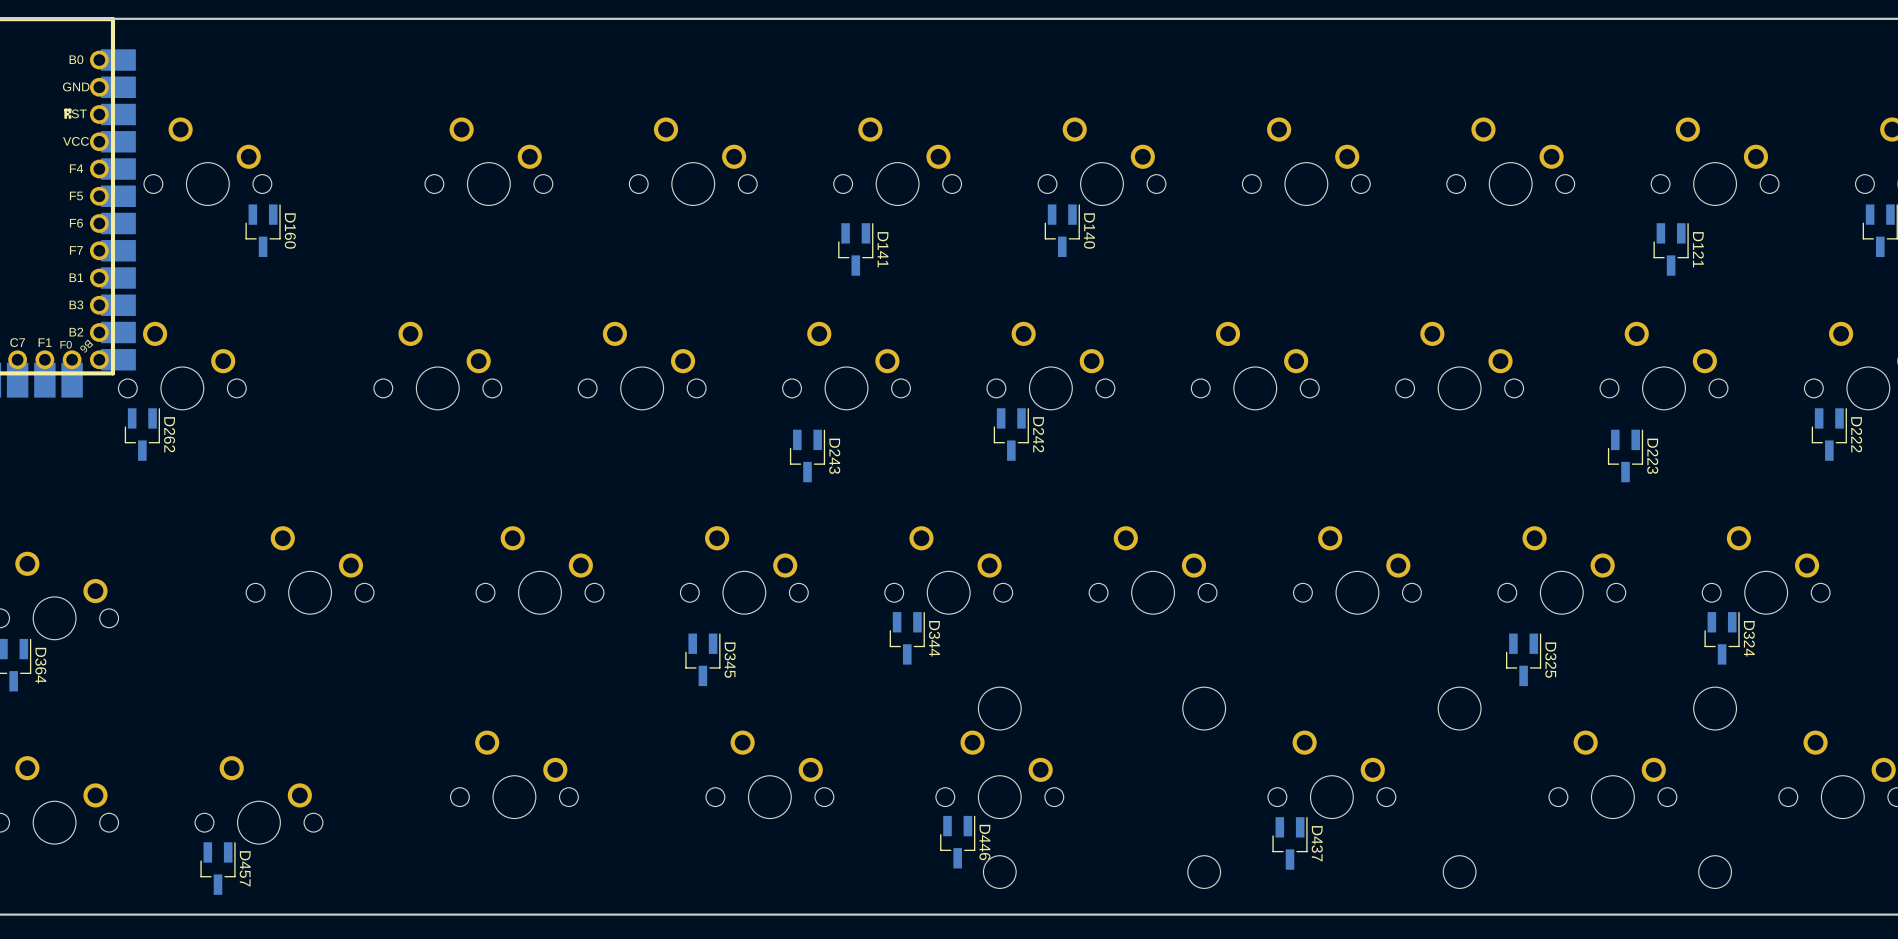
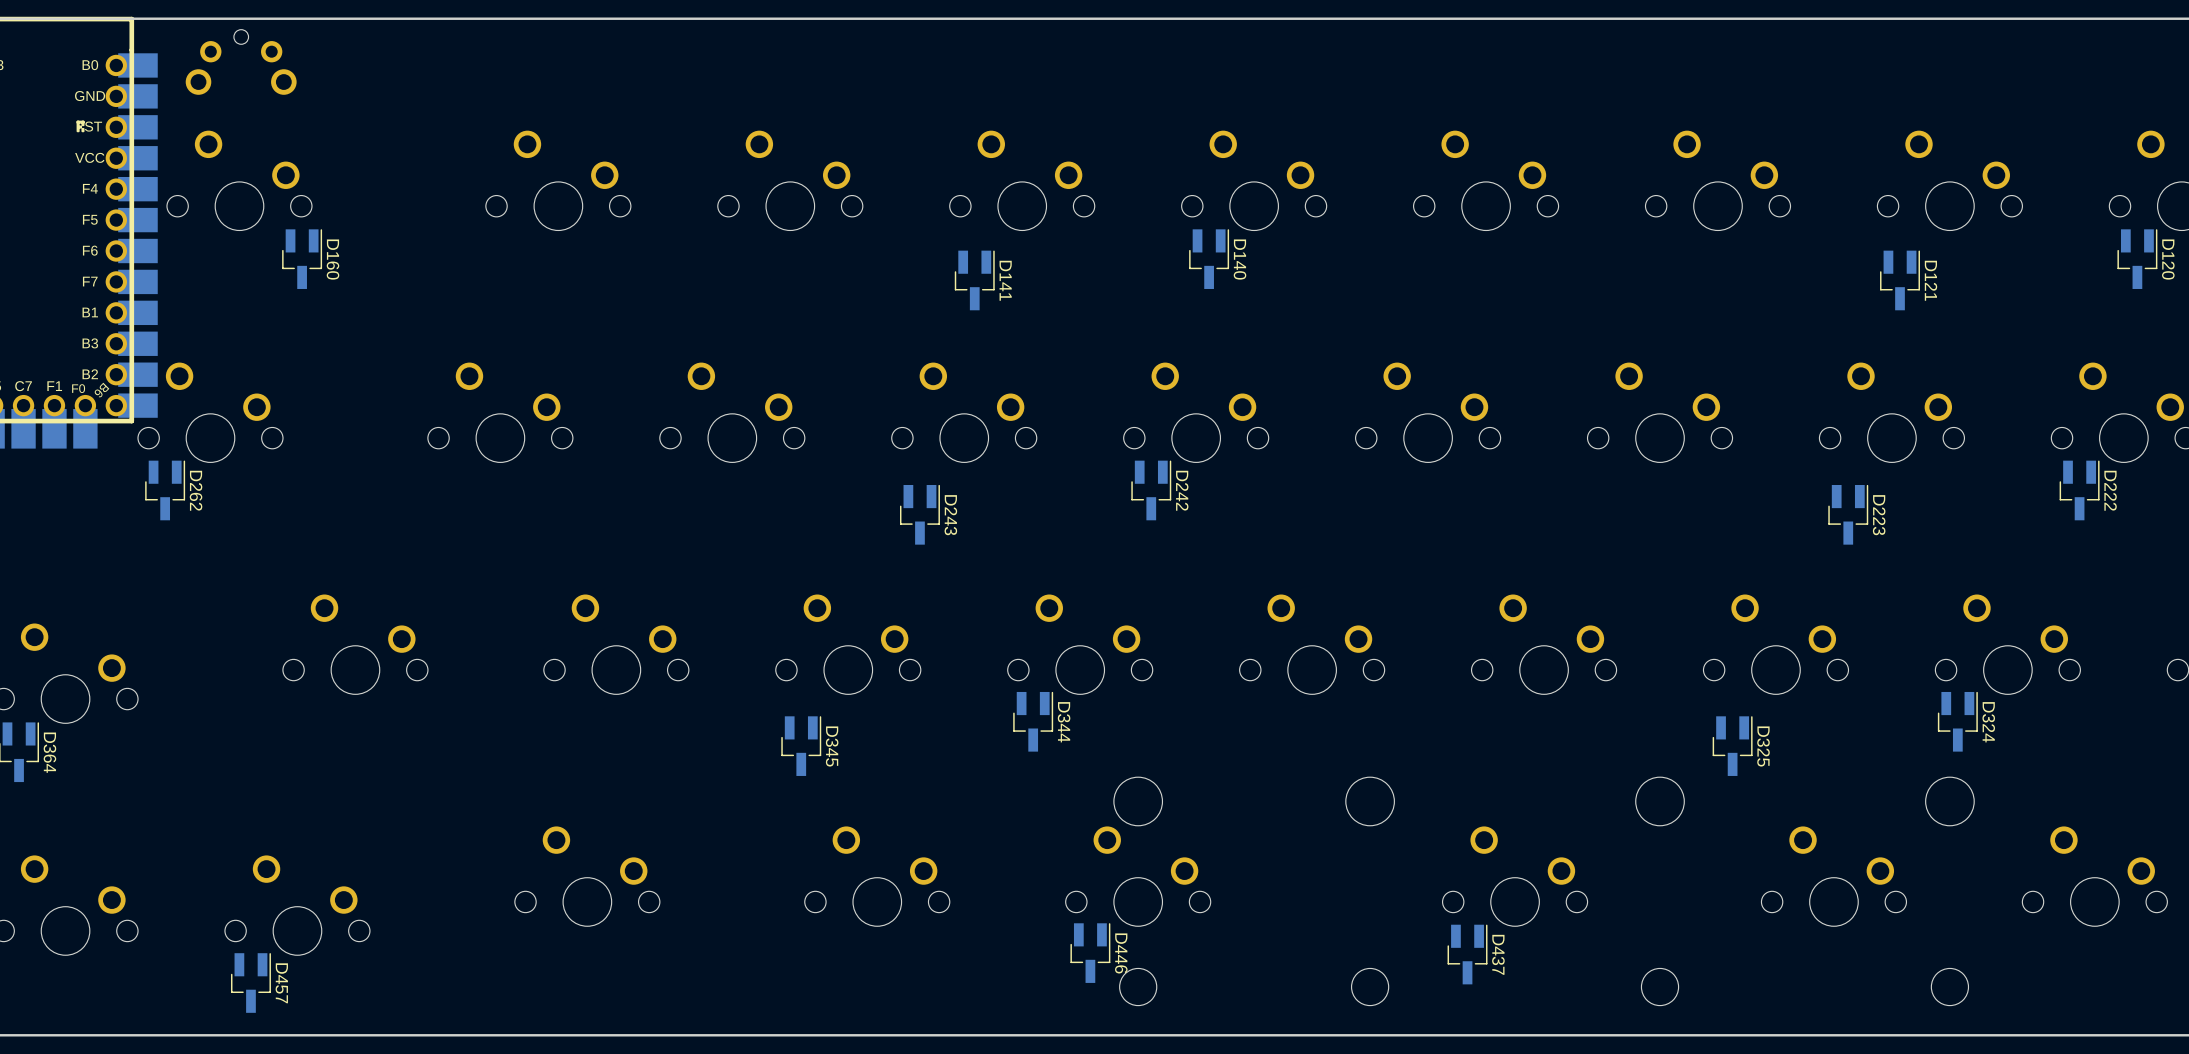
part: none -> (241, 62)

